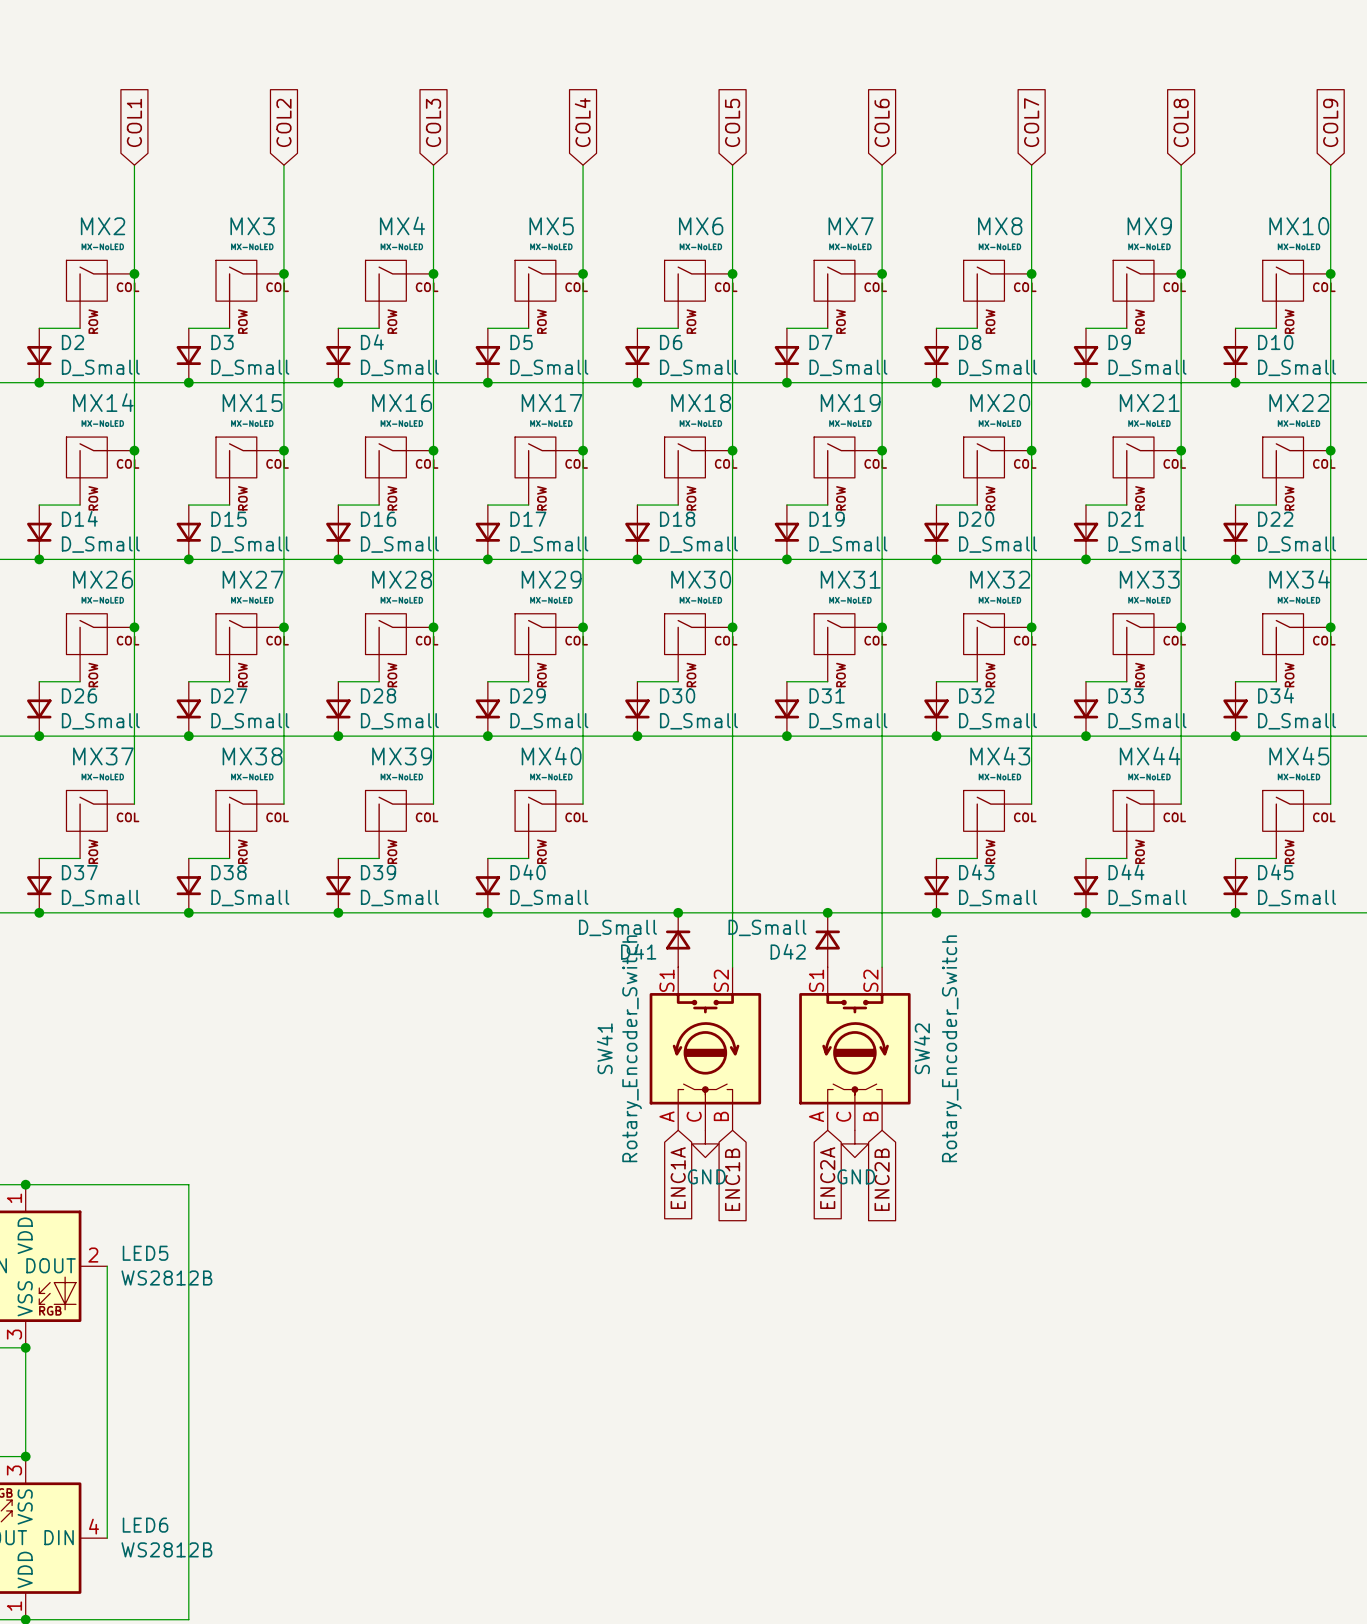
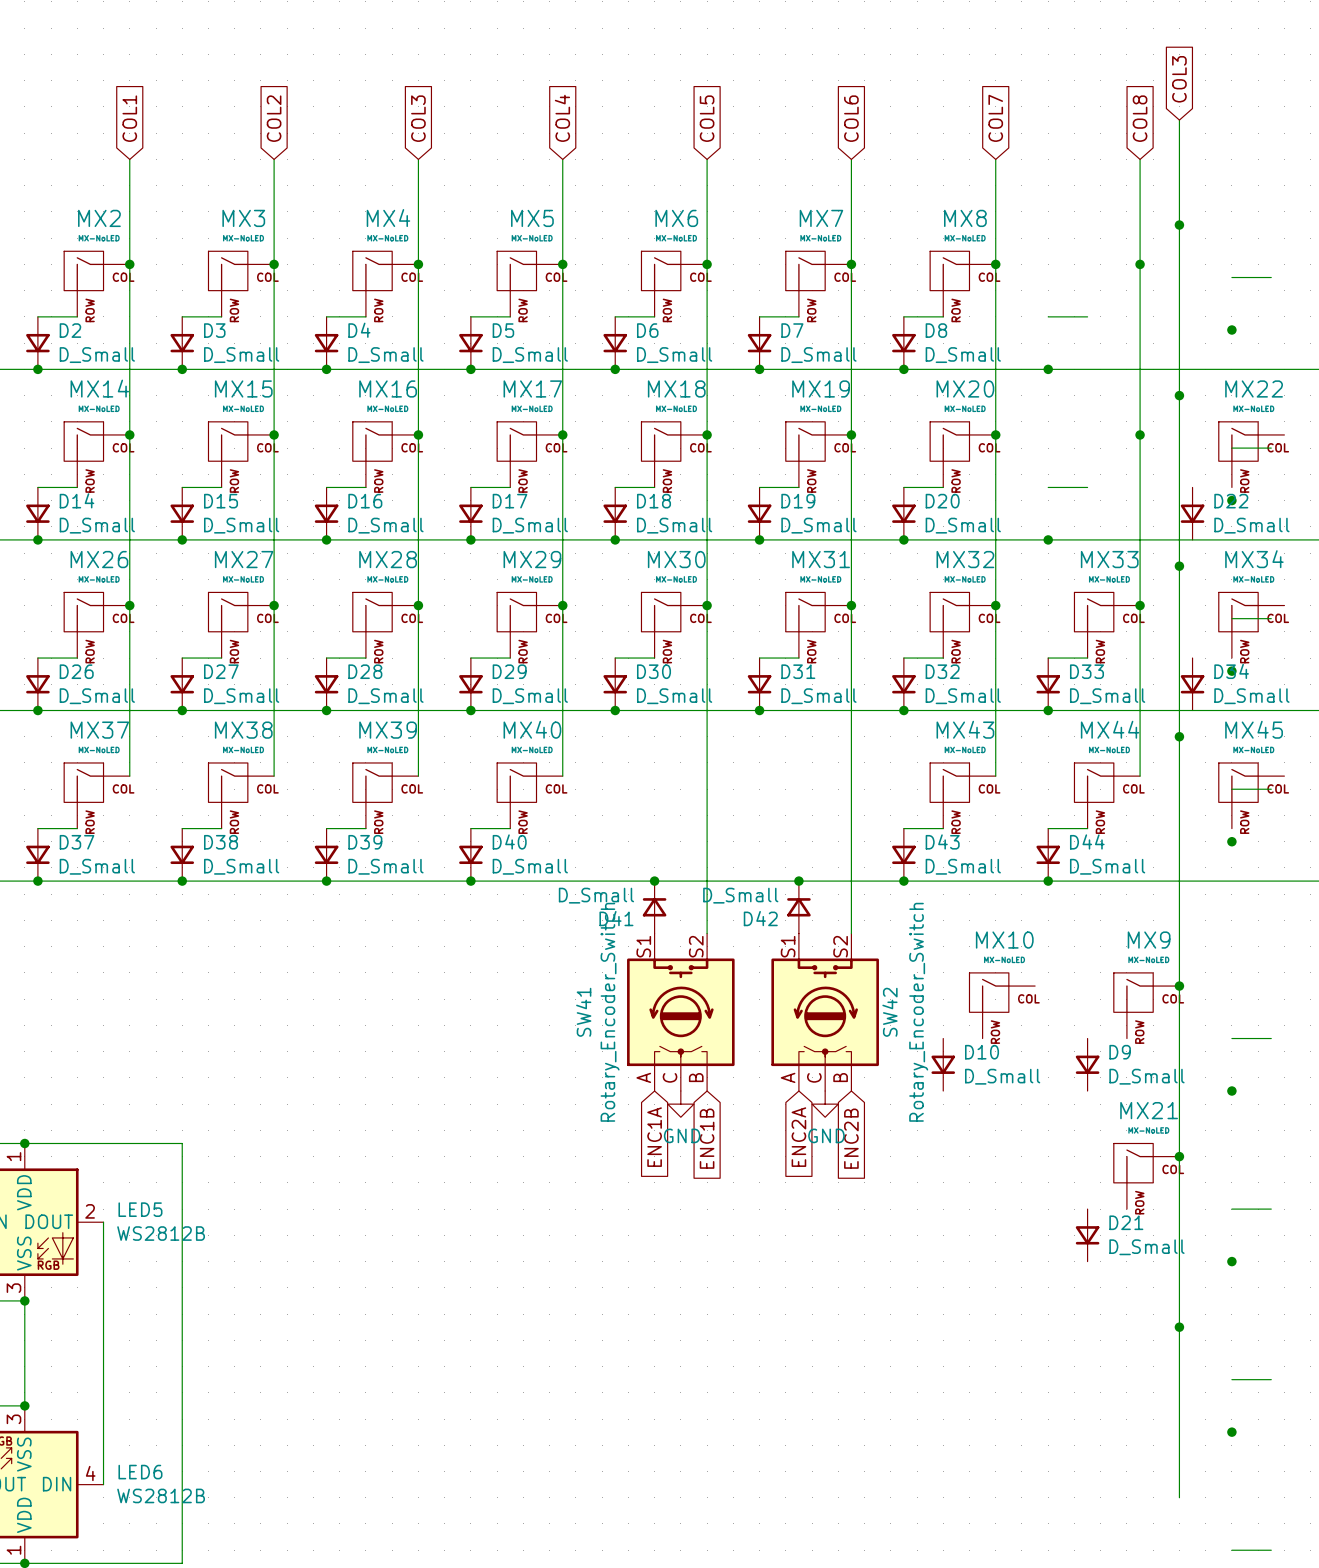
global label: none -> COL3 (1179, 79)
global label: COL9 (1330, 122) -> none
wire: none -> (1179, 120) (1179, 1497)
wire: (1330, 165) (1330, 804) -> none
junction: none -> (1179, 225)
junction: (1330, 273) -> none
MX9 position: (1147, 294) -> (1146, 1005)
MX10 position: (1296, 294) -> (1002, 1005)
wire: (1235, 328) (1276, 328) -> (1231, 277) (1271, 277)
junction: none -> (1231, 330)
D9 position: (1086, 355) -> (1087, 1064)
D10 position: (1235, 355) -> (943, 1064)
junction: (1235, 382) -> none
junction: none -> (1179, 395)
junction: (1330, 450) -> none
MX21 position: (1147, 471) -> (1146, 1176)
wire: (1235, 505) (1276, 505) -> (1231, 448) (1271, 448)
junction: none -> (1231, 500)
D21 position: (1086, 532) -> (1087, 1235)
junction: (1235, 559) -> none
junction: none -> (1179, 566)
junction: (1330, 627) -> none
wire: (1235, 681) (1276, 681) -> (1231, 618) (1271, 618)
junction: none -> (1231, 671)
junction: (1235, 736) -> none
junction: none -> (1179, 736)
wire: (1235, 858) (1276, 858) -> (1231, 789) (1271, 789)
junction: none -> (1231, 841)
D45: D_Small (1235, 885) -> none
junction: (1235, 912) -> none
junction: none -> (1179, 986)
wire: none -> (1231, 1038) (1271, 1038)
junction: none -> (1231, 1091)
junction: none -> (1179, 1156)
wire: none -> (1231, 1209) (1271, 1209)
junction: none -> (1231, 1261)
junction: none -> (1179, 1327)
wire: none -> (1231, 1379) (1271, 1379)
junction: none -> (1231, 1432)
wire: none -> (1231, 1550) (1271, 1550)

